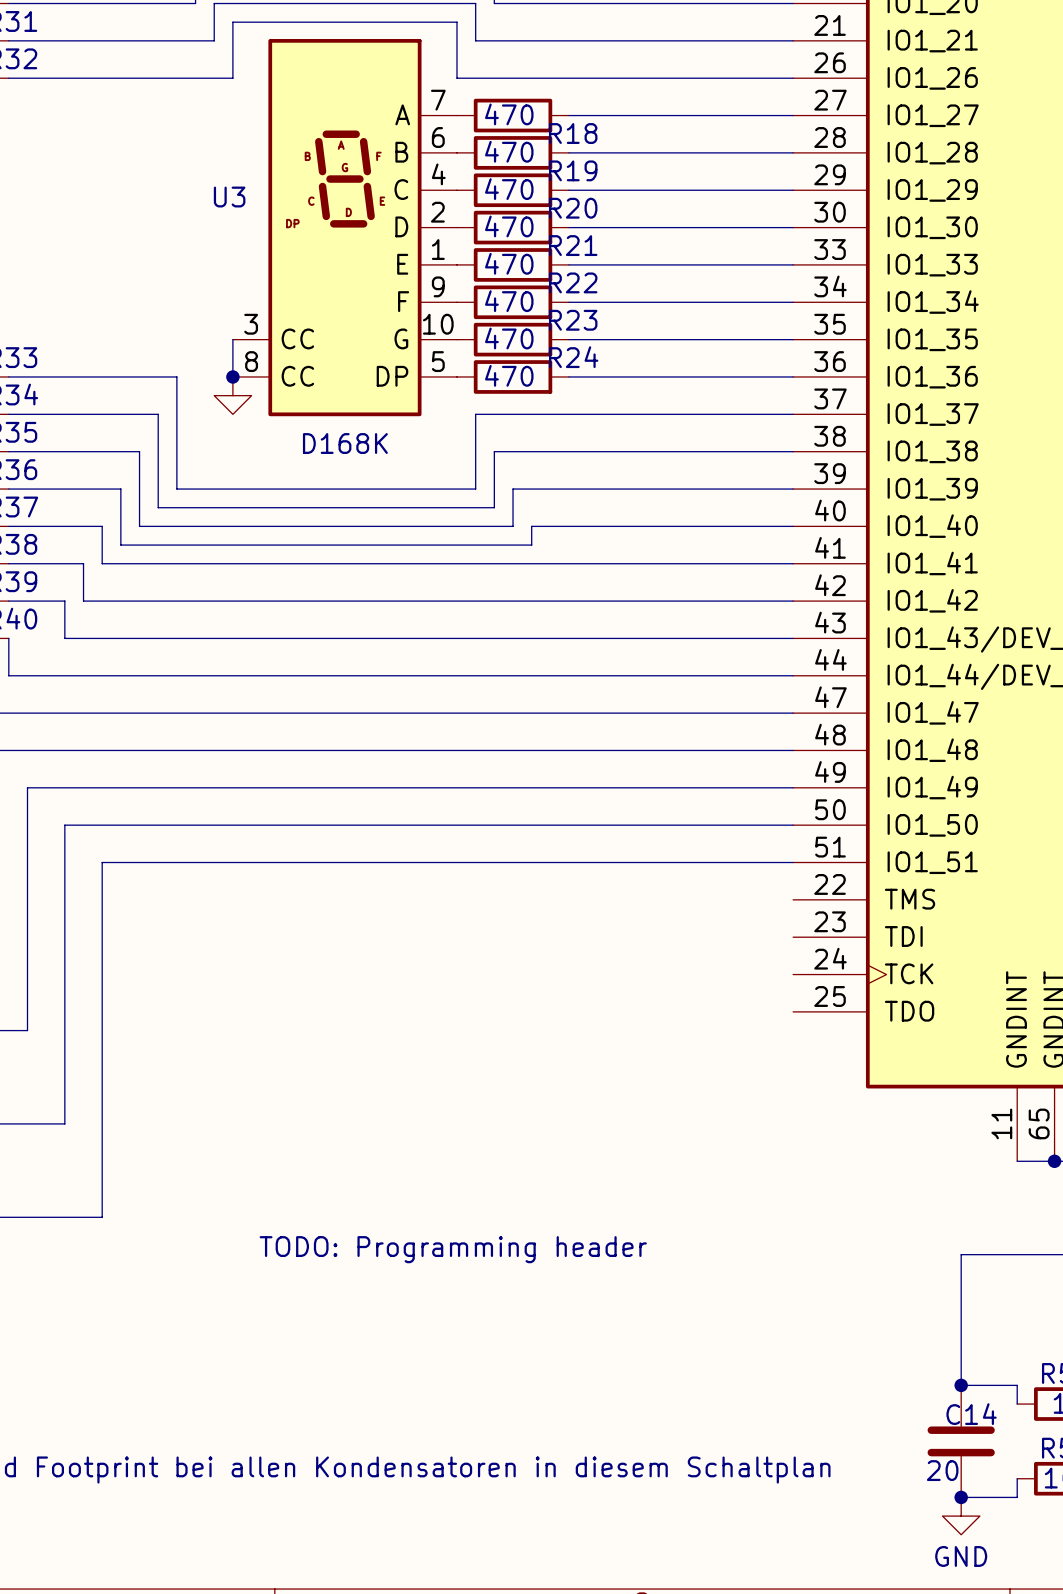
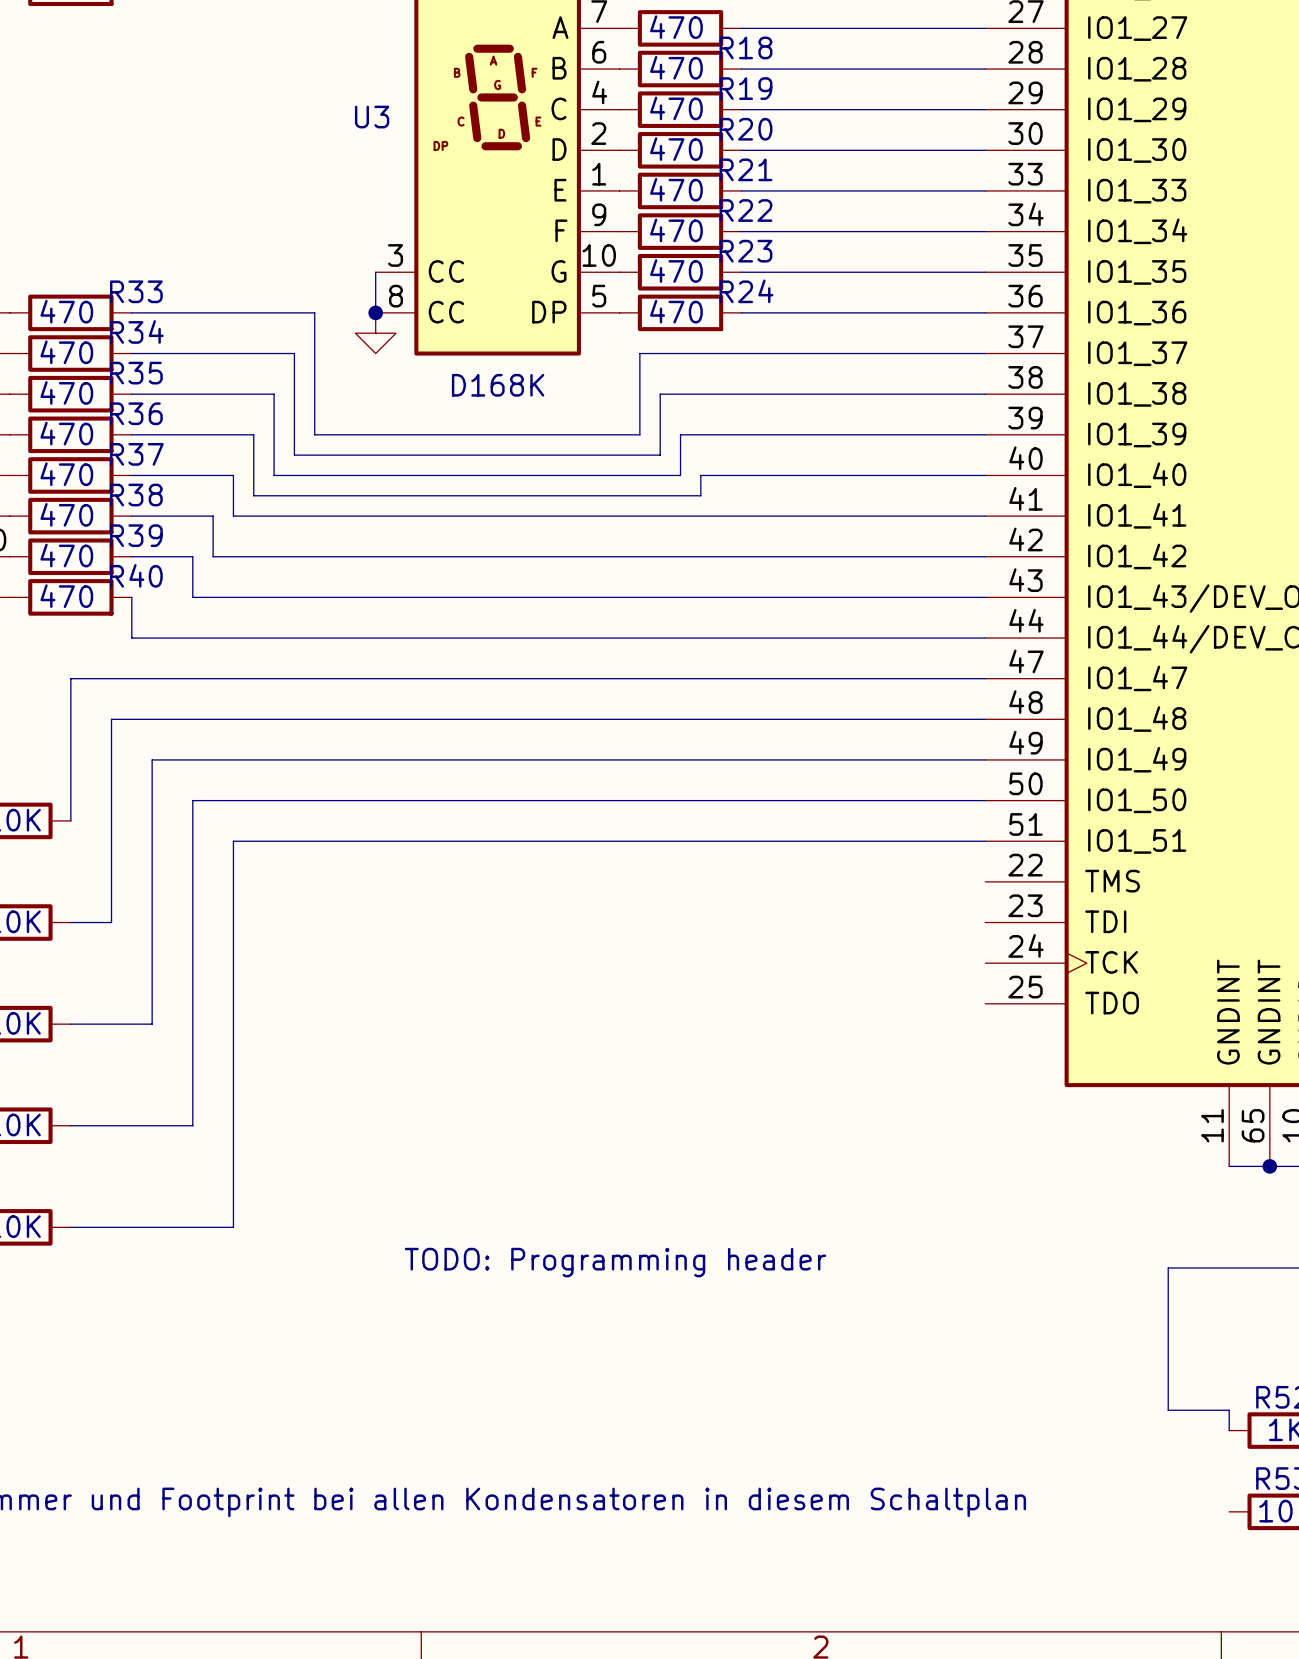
junction: (961, 1385) -> none
C14: 20 (961, 1441) -> none
wire: (1017, 1478) (1017, 1497) (961, 1497) -> none
junction: (961, 1497) -> none
power symbol: GND (961, 1516) -> none

